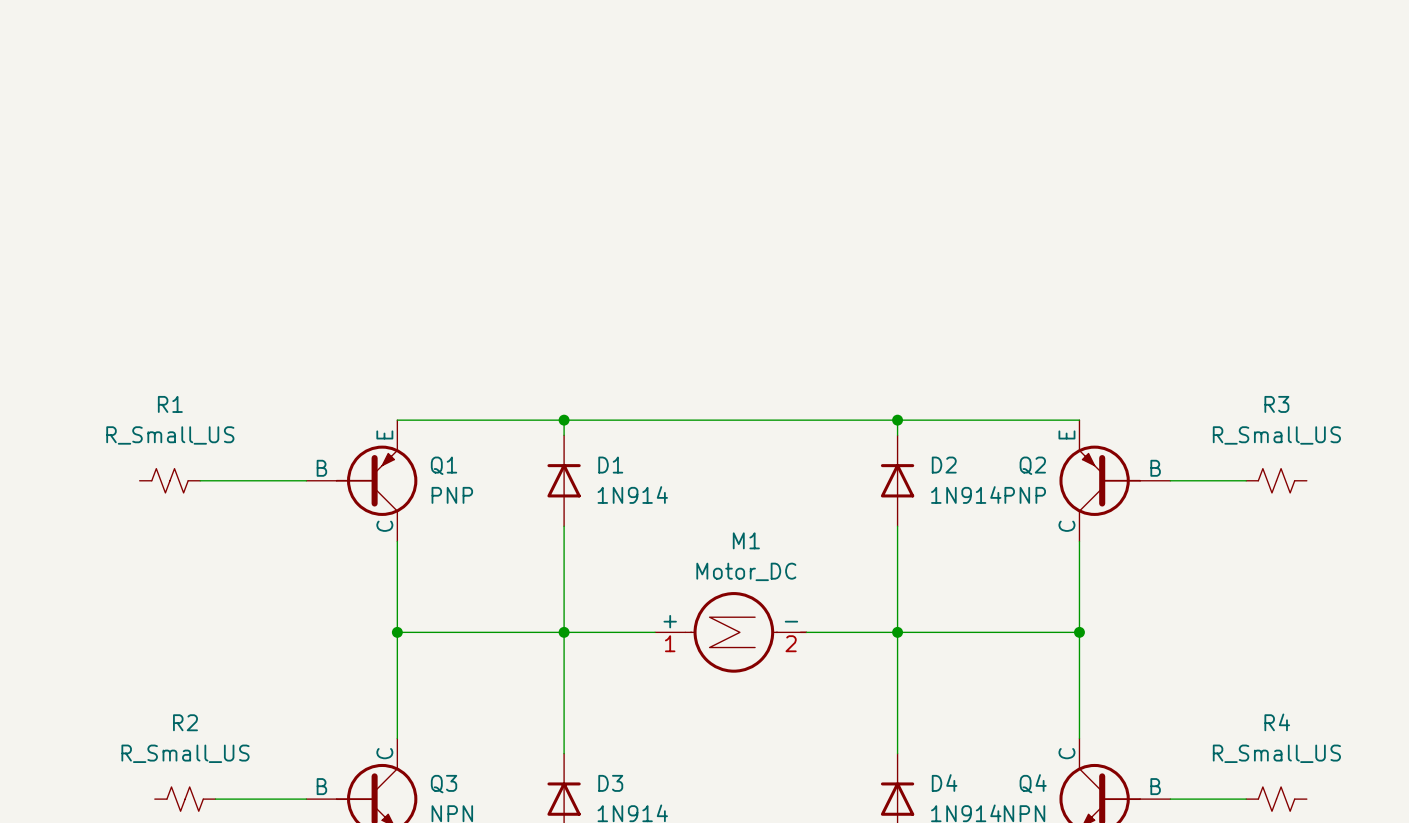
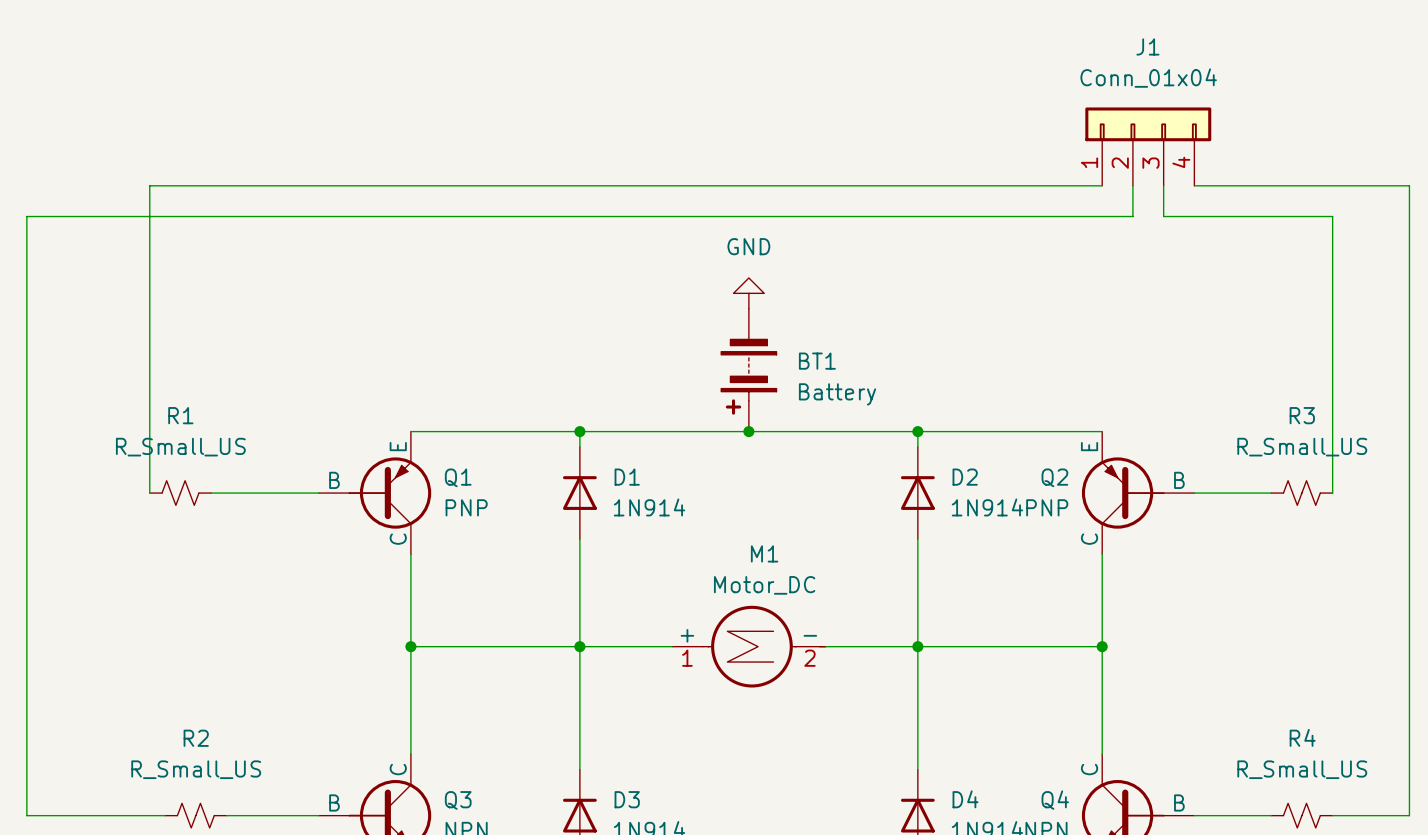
J1: none -> Conn_01x04 (1148, 146)
wire: none -> (1102, 185) (149, 185) (149, 493)
wire: none -> (1132, 185) (1132, 216) (26, 216) (26, 815) (165, 815)
wire: none -> (1163, 185) (1163, 216) (1332, 216) (1332, 493)
wire: none -> (1194, 185) (1409, 185) (1409, 815) (1332, 815)
power symbol: none -> GND (748, 293)
BT1: none -> Battery (748, 370)
junction: none -> (748, 431)

